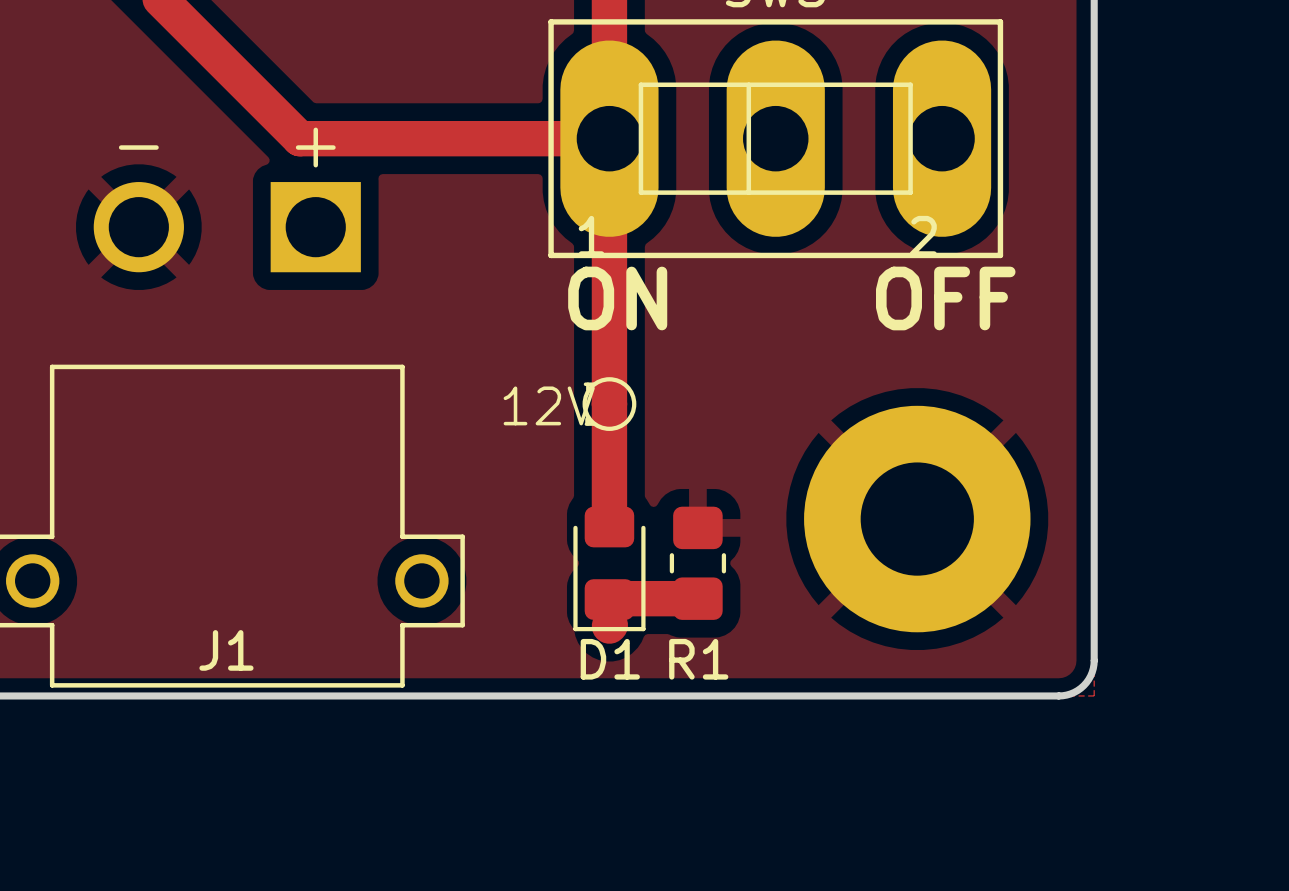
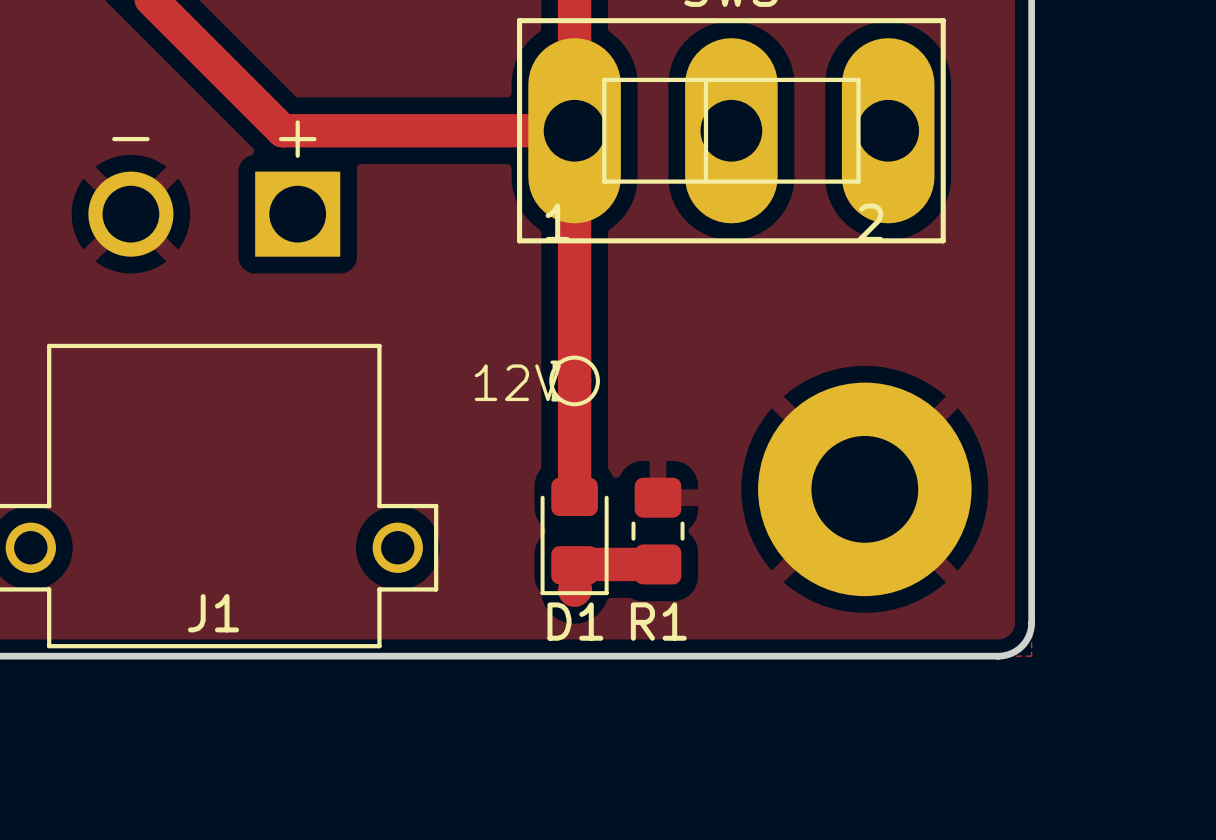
text: ON (617, 298) -> none
text: OFF (945, 298) -> none

